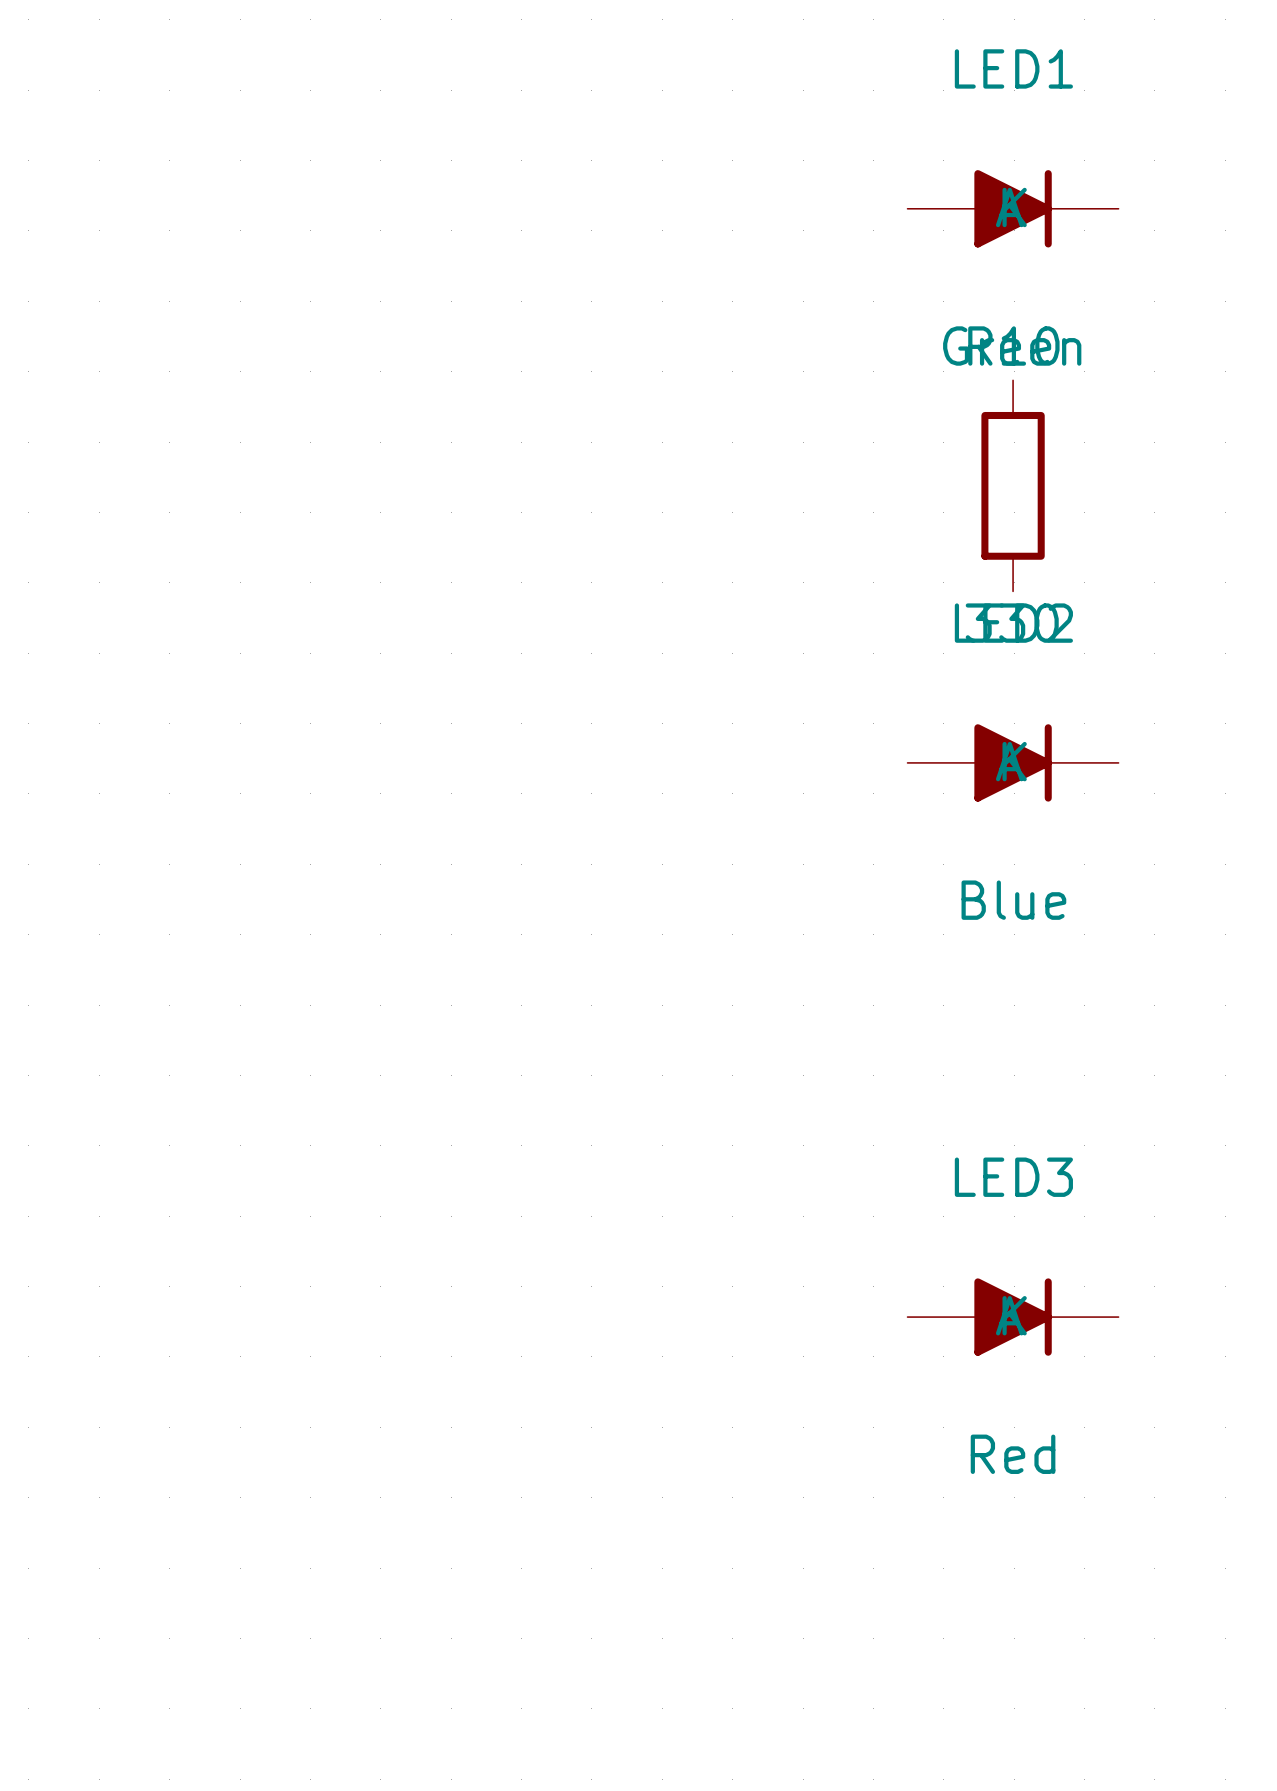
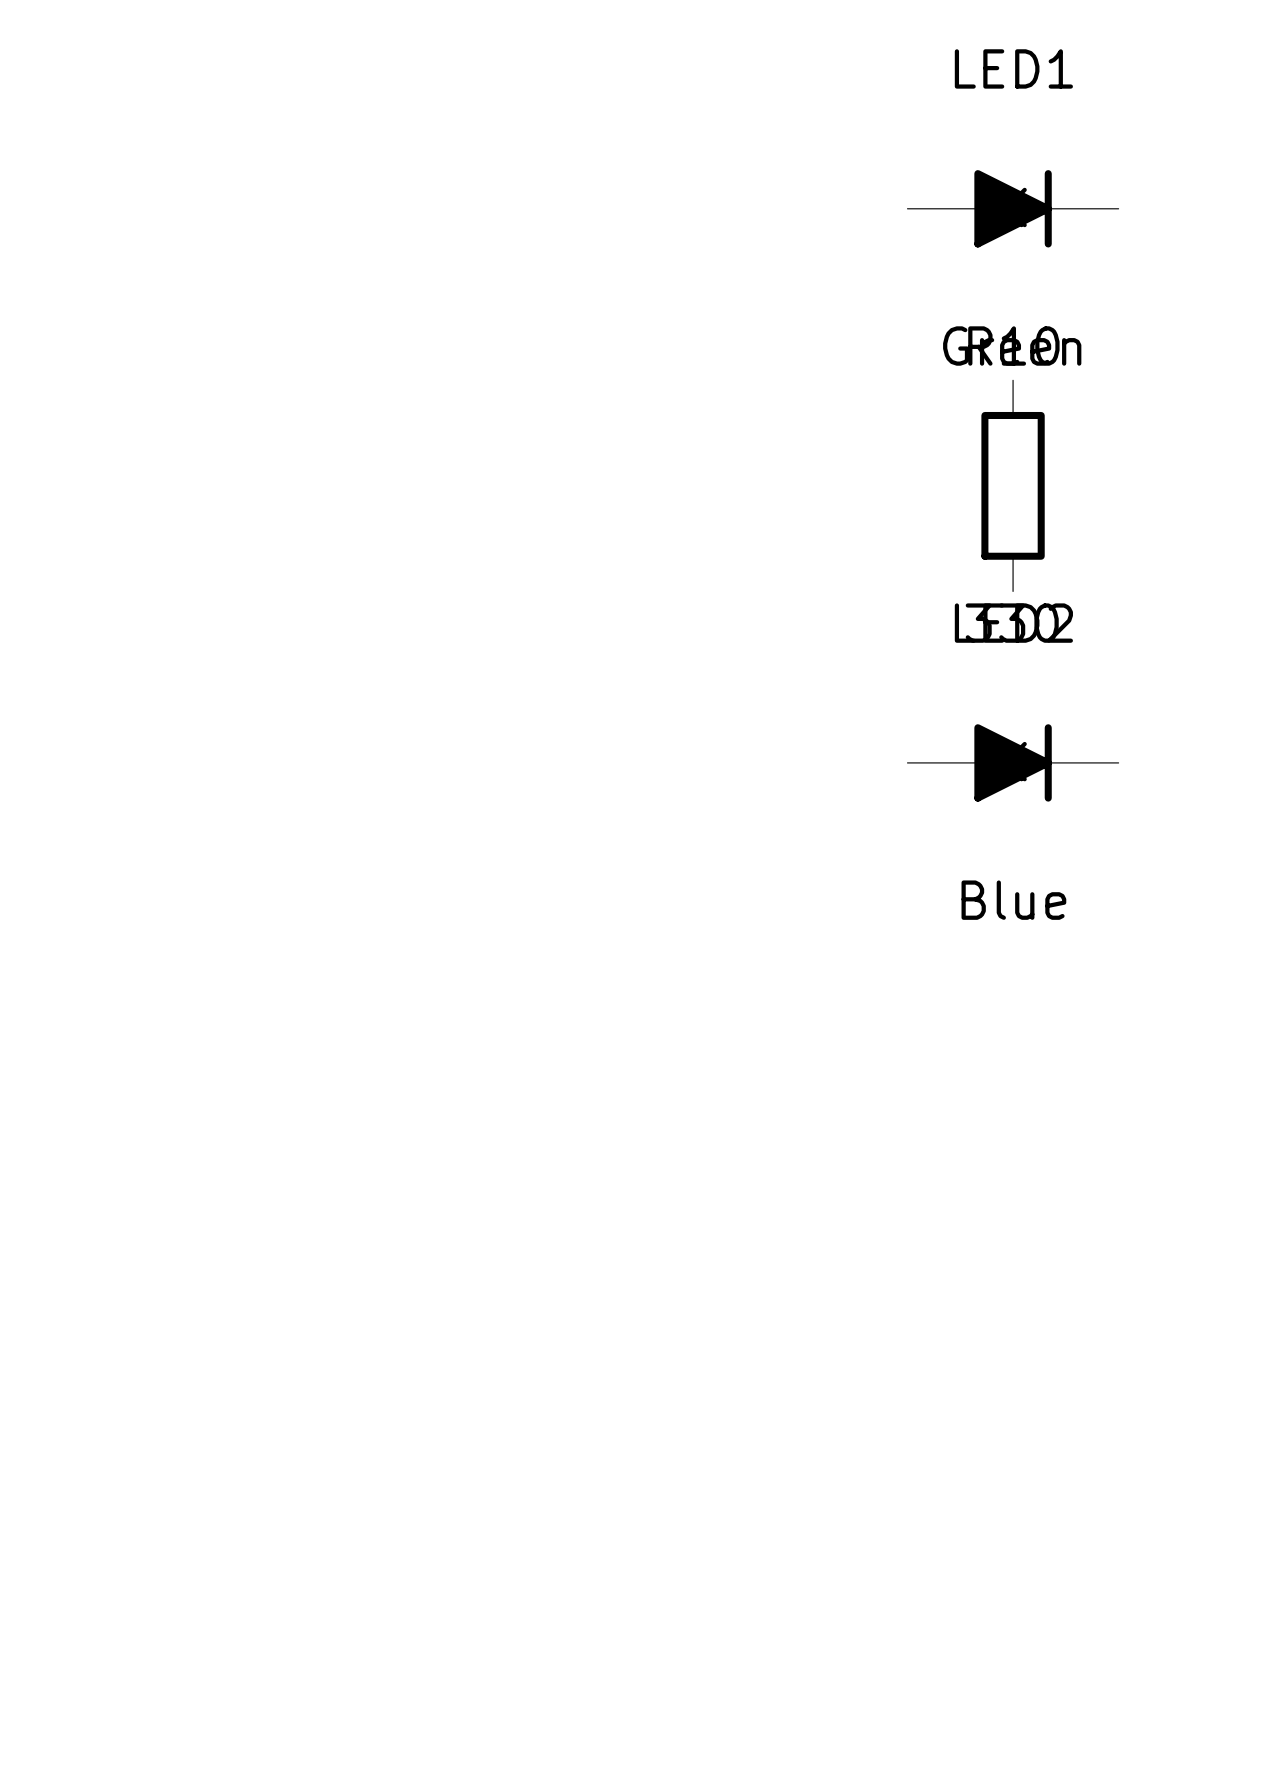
LED3: Red (1013, 1317) -> none

